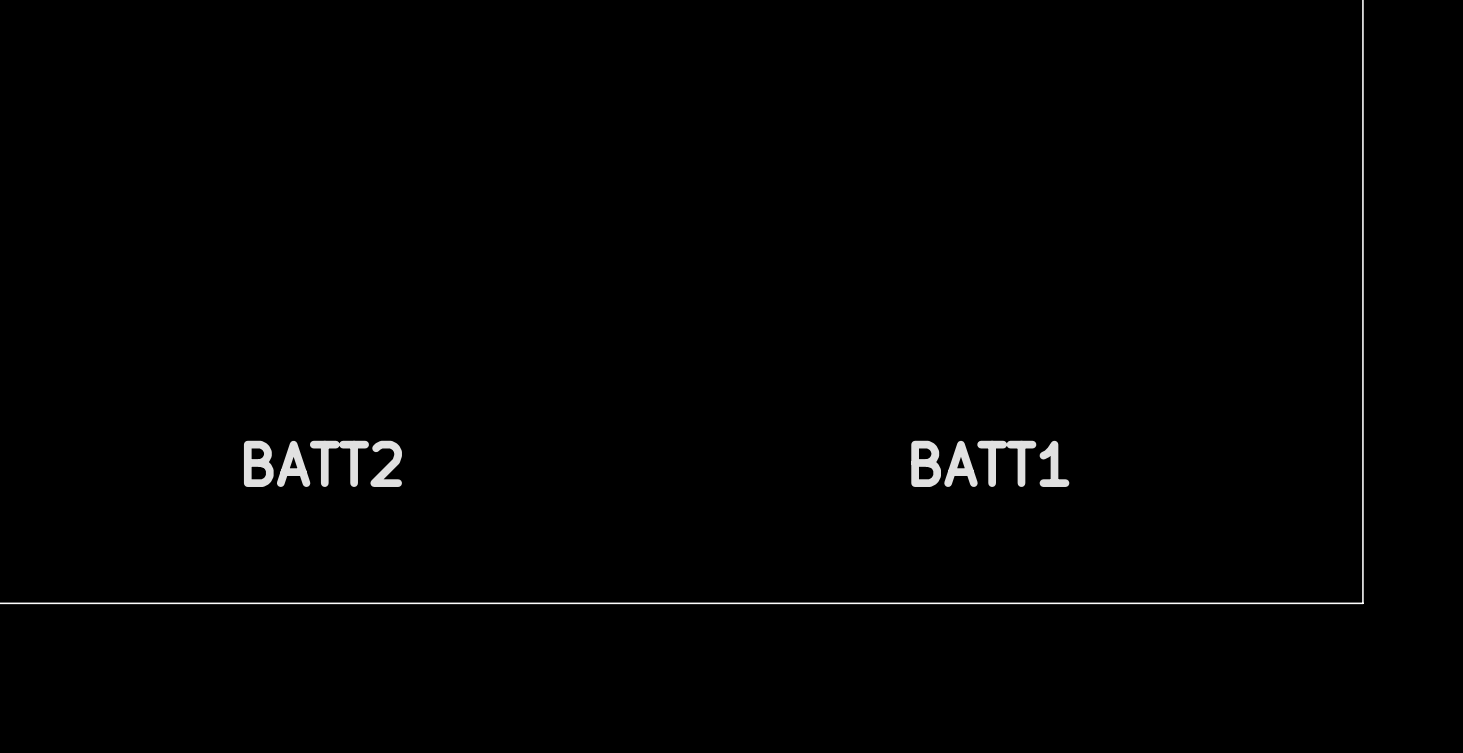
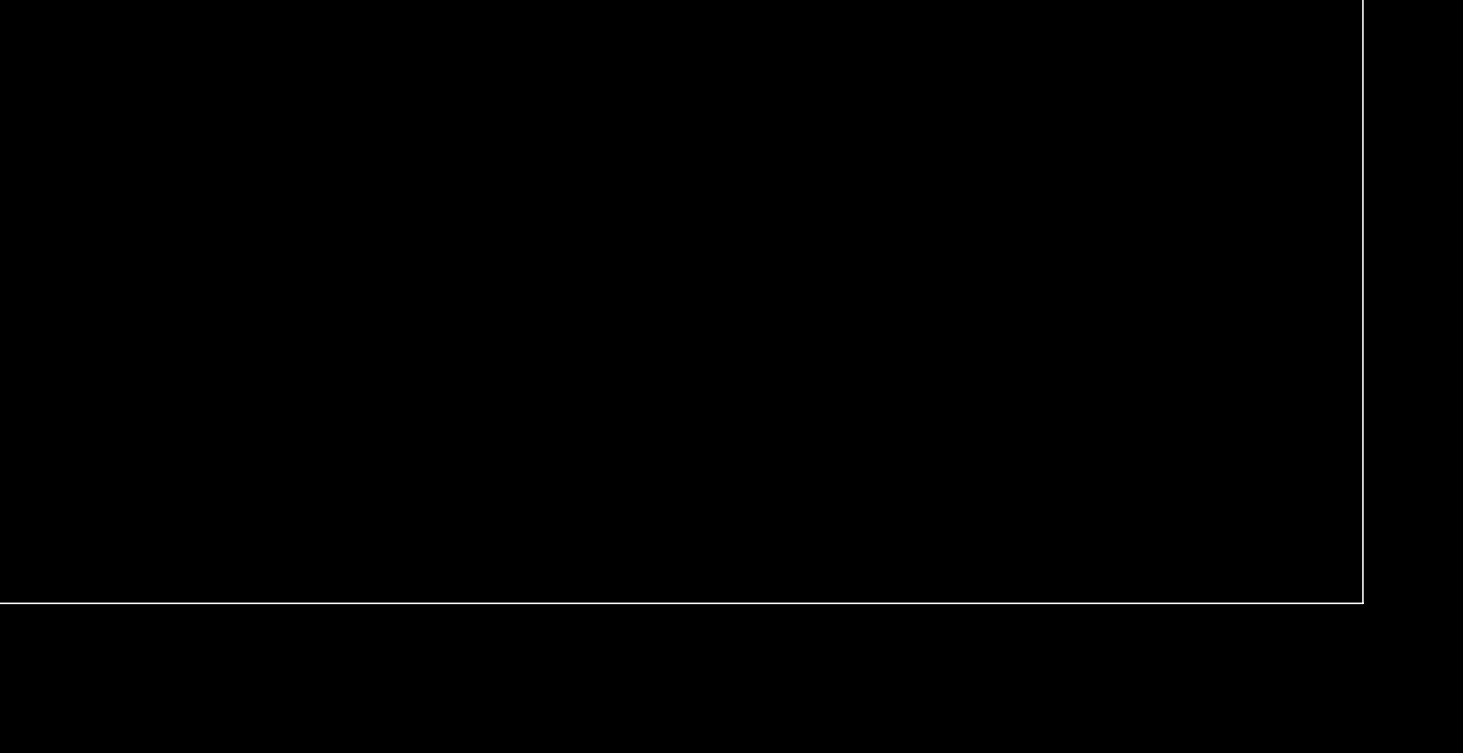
text: BATT2 (322, 463) -> none
text: BATT1 (990, 463) -> none

